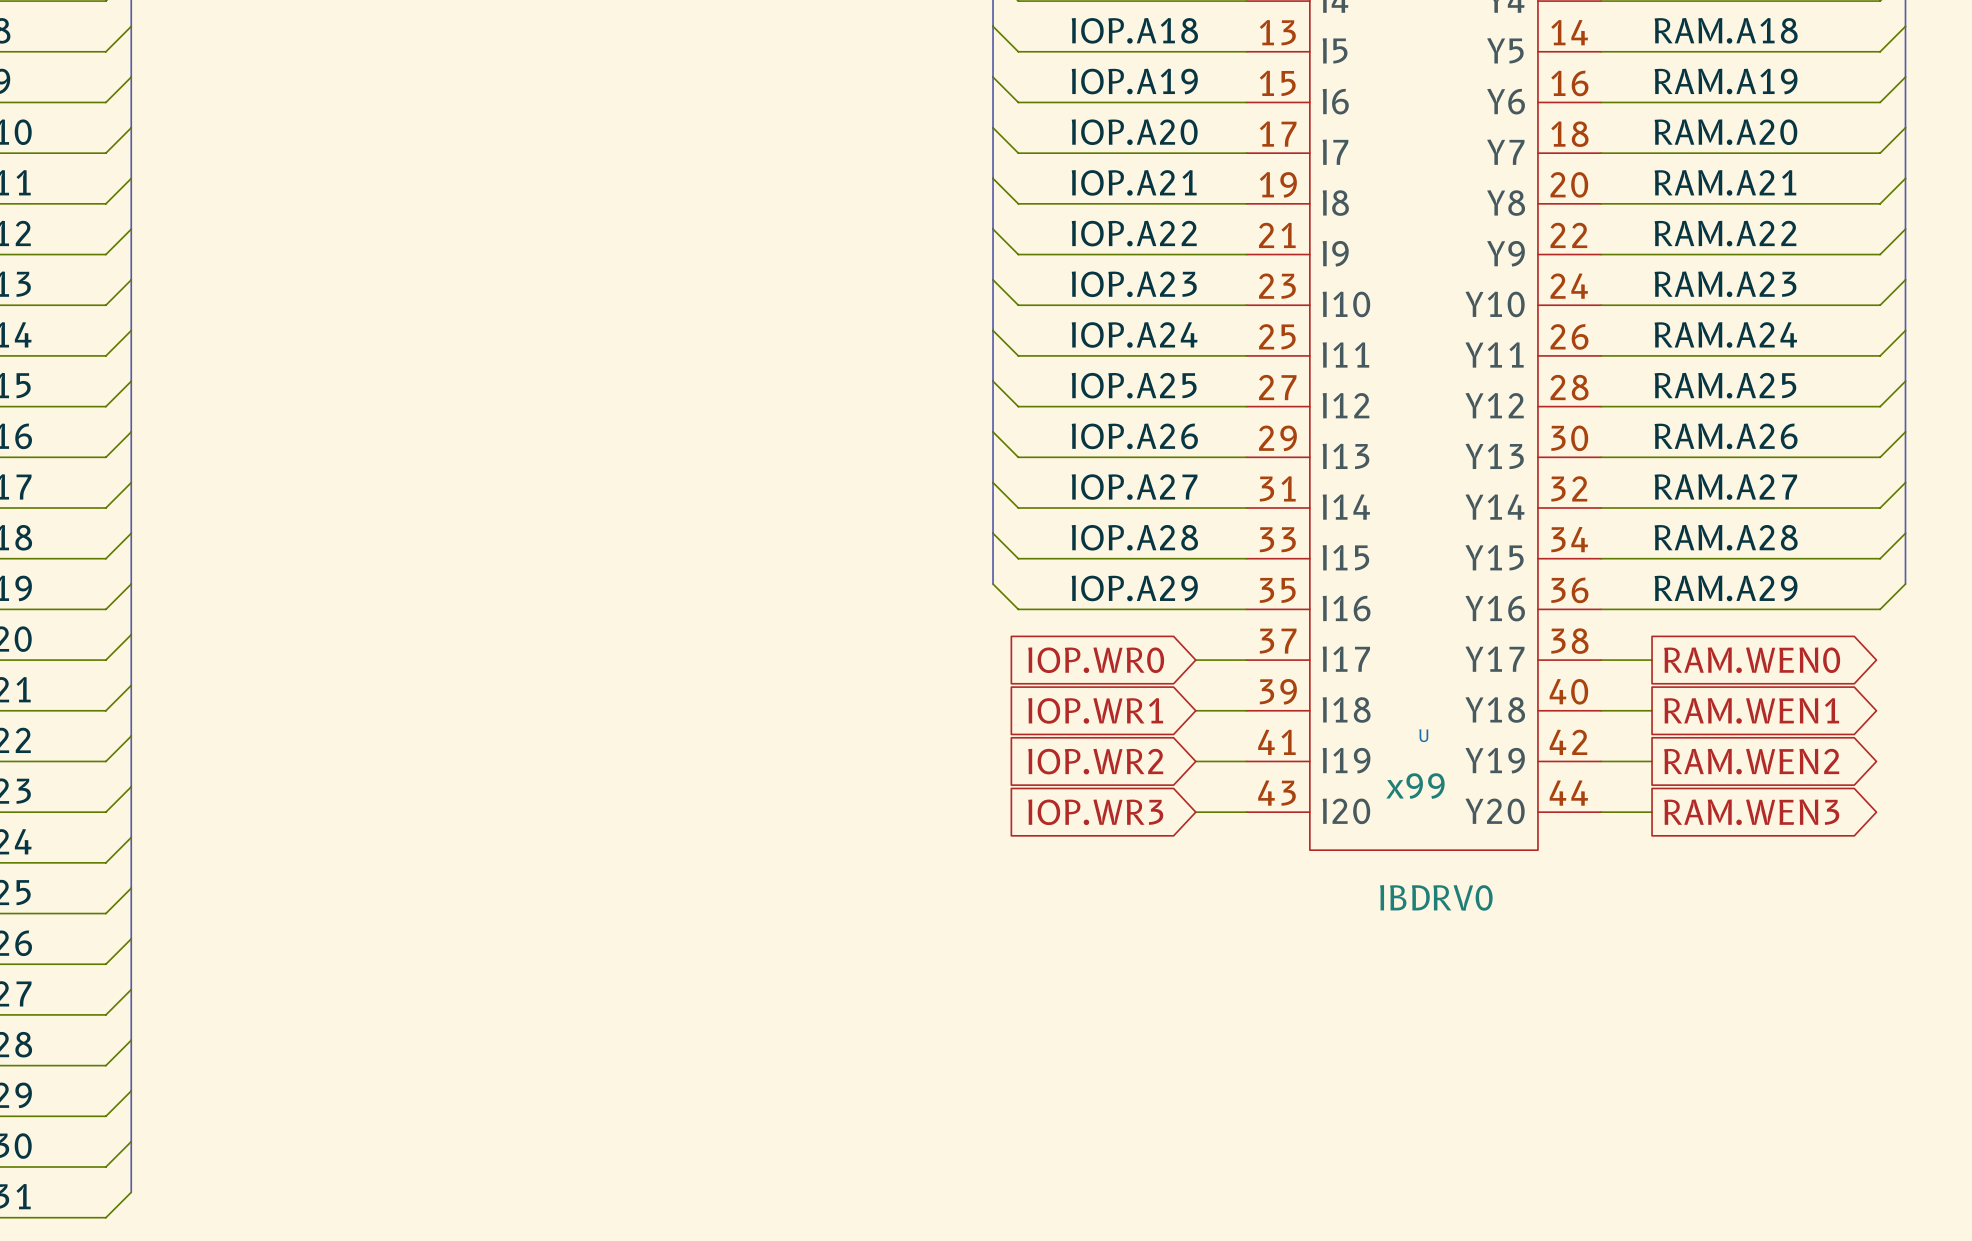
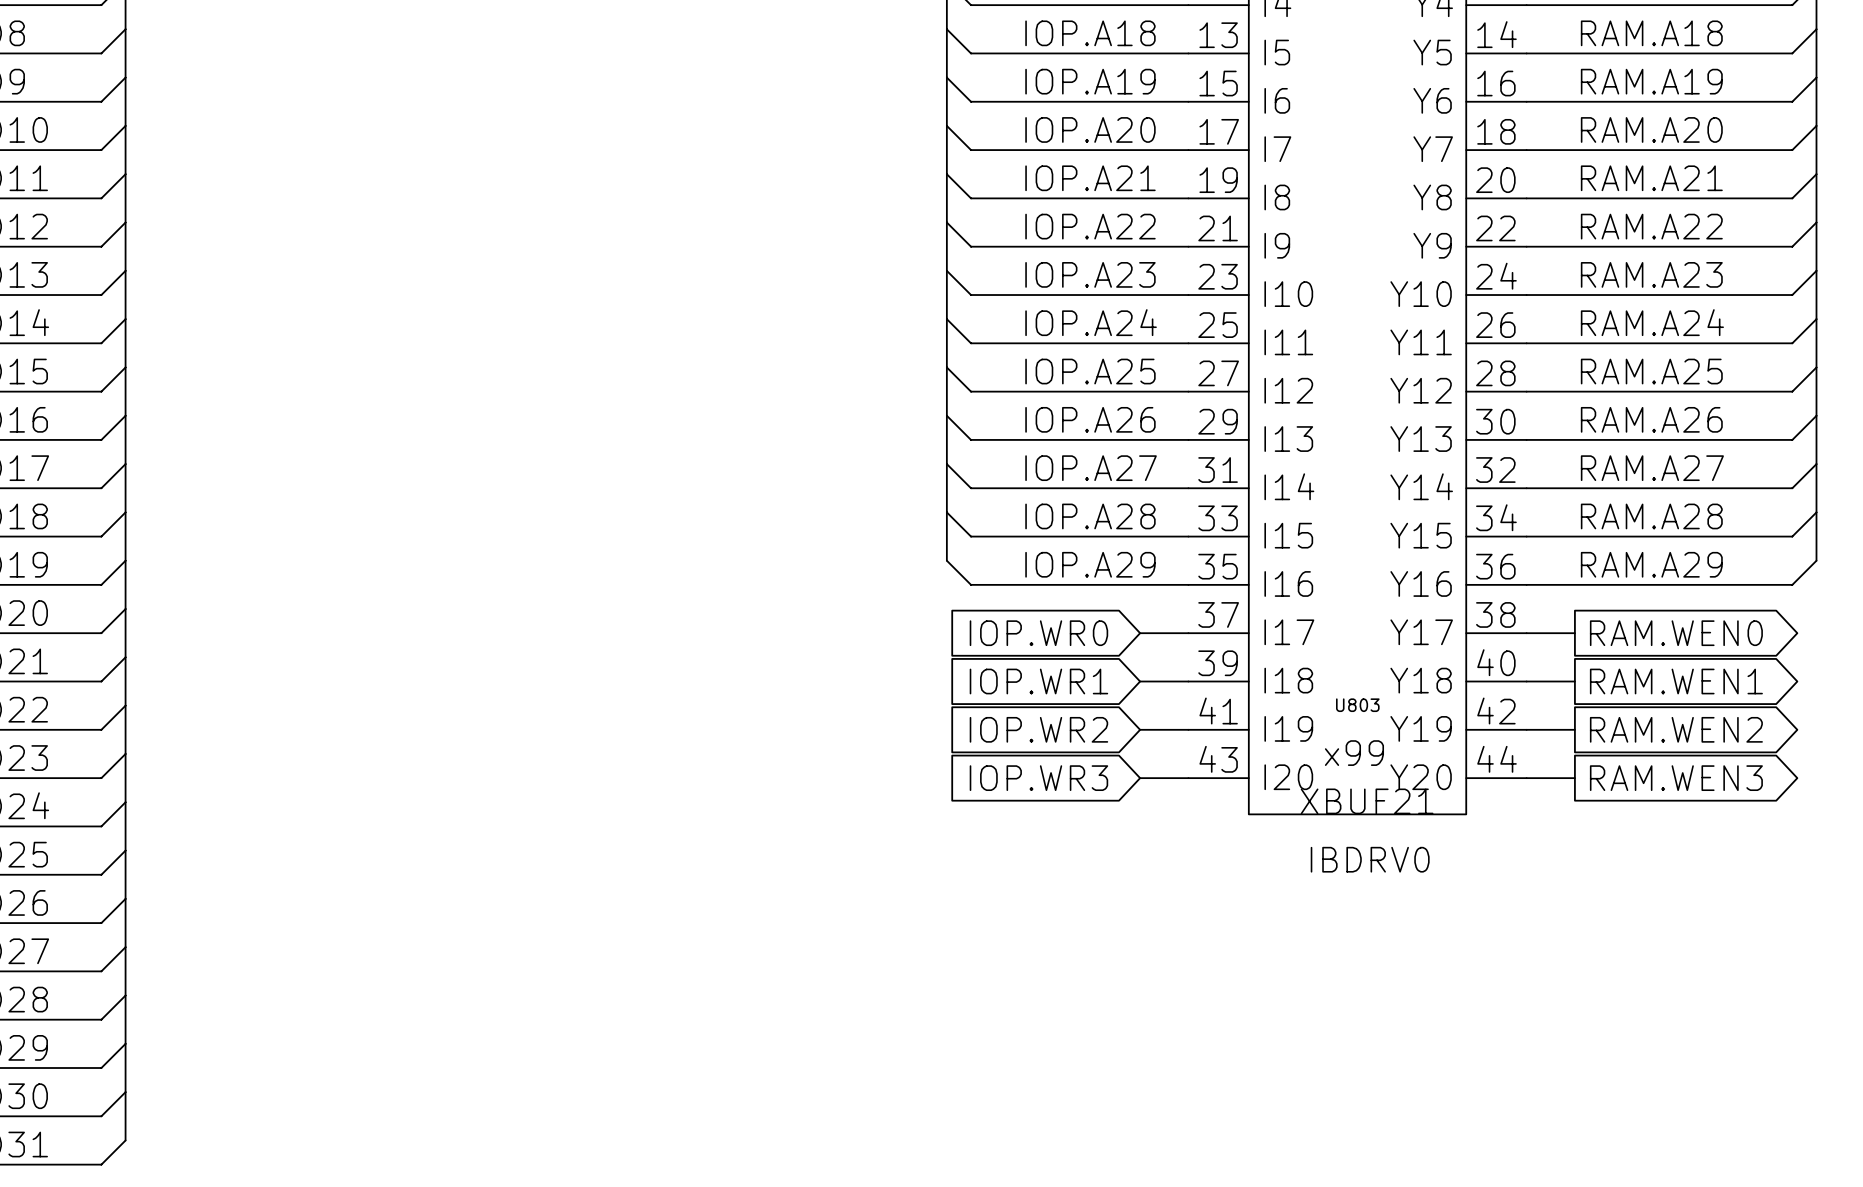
U name: U (1423, 735) -> U803 (1357, 705)
U value: none -> XBUF21 (1367, 801)

